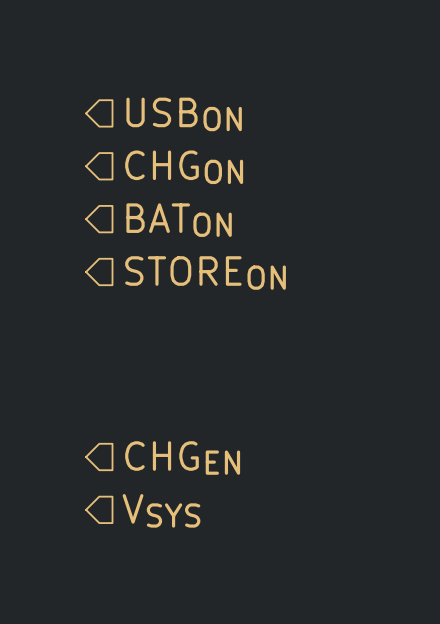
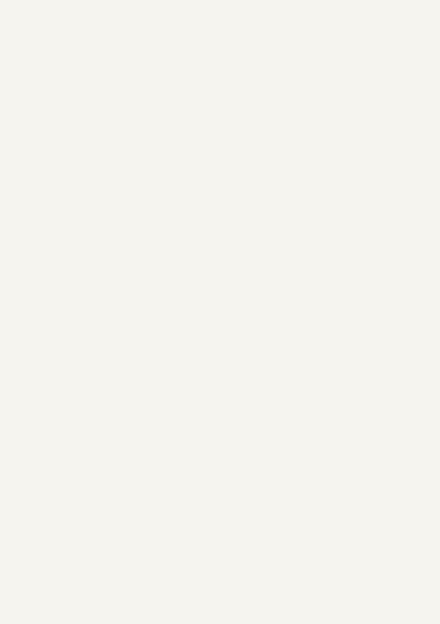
hierarchical label: USBON (184, 114) -> none
hierarchical label: CHGON (184, 167) -> none
hierarchical label: BATON (179, 220) -> none
hierarchical label: STOREON (205, 272) -> none
hierarchical label: CHGEN (182, 458) -> none
hierarchical label: VSYS (161, 510) -> none

